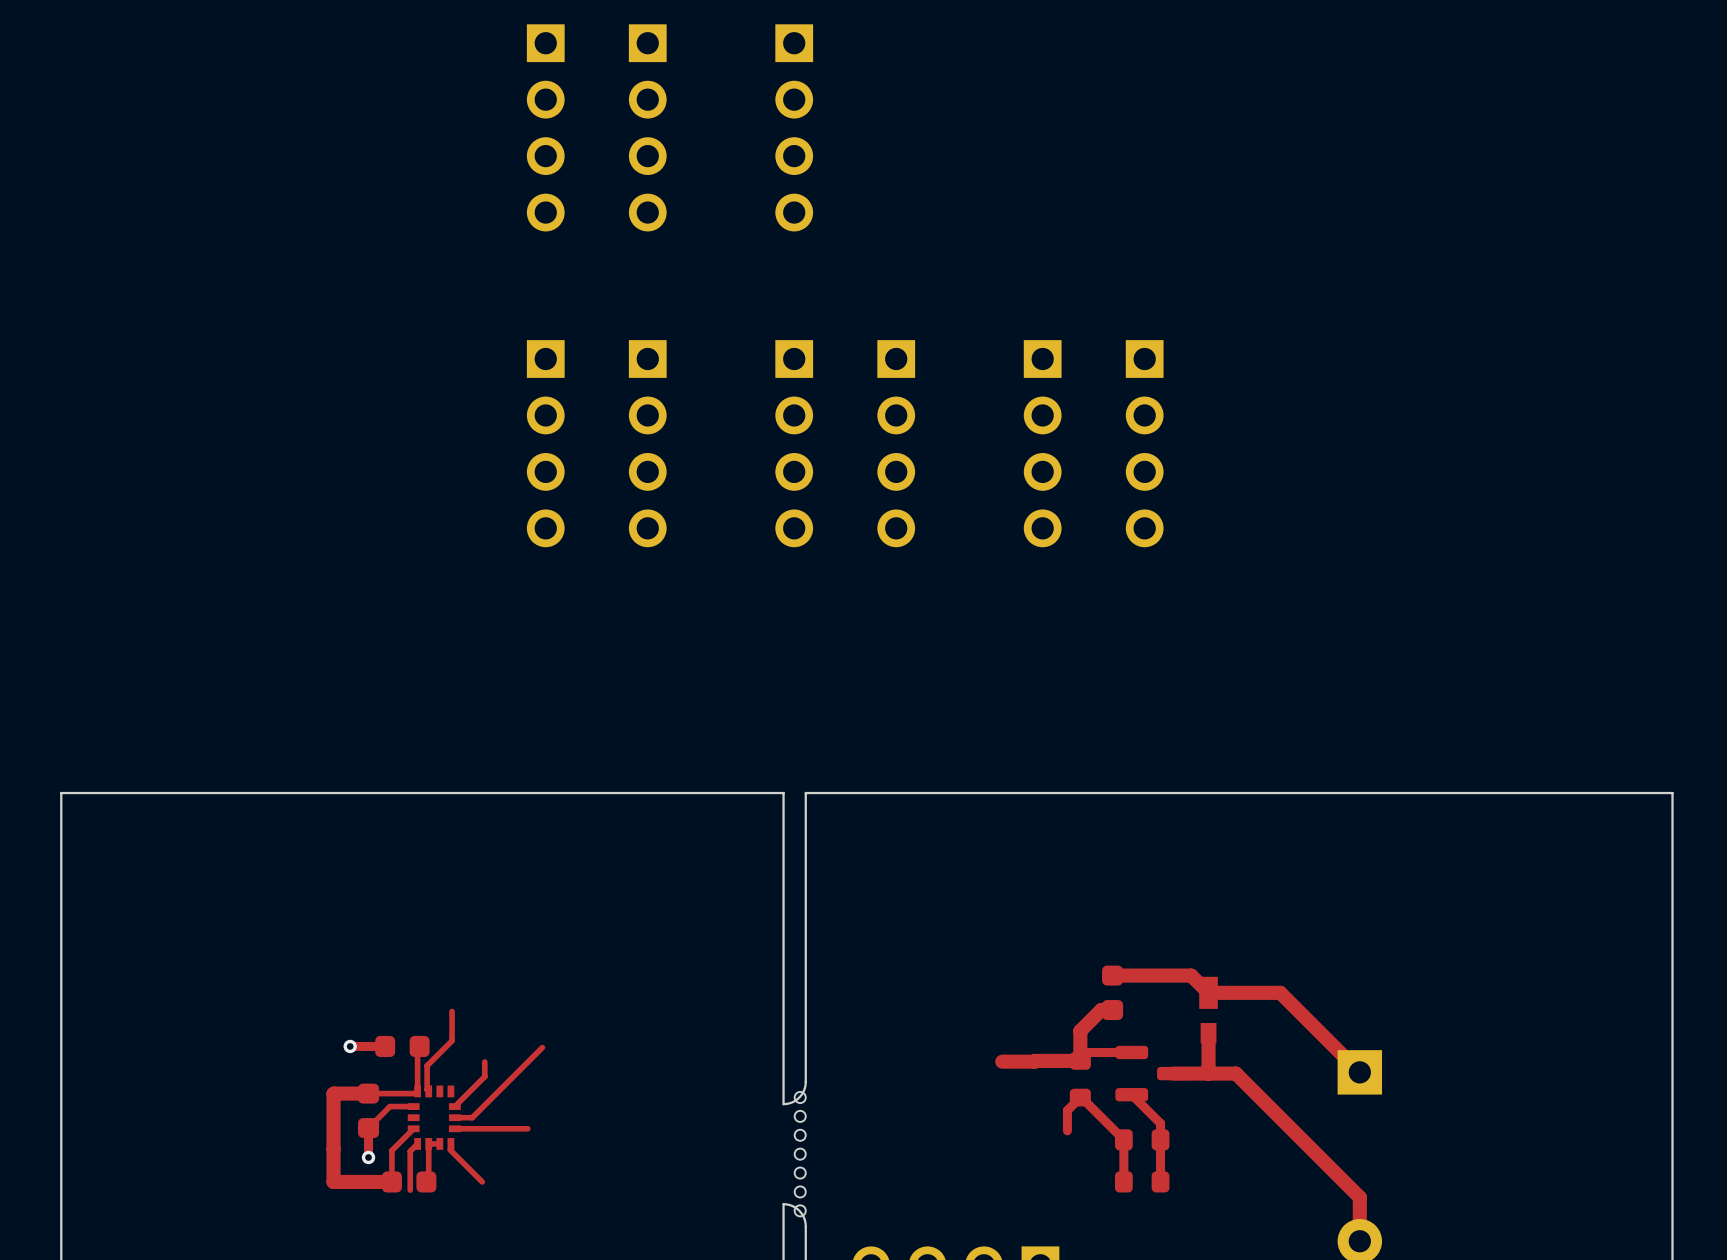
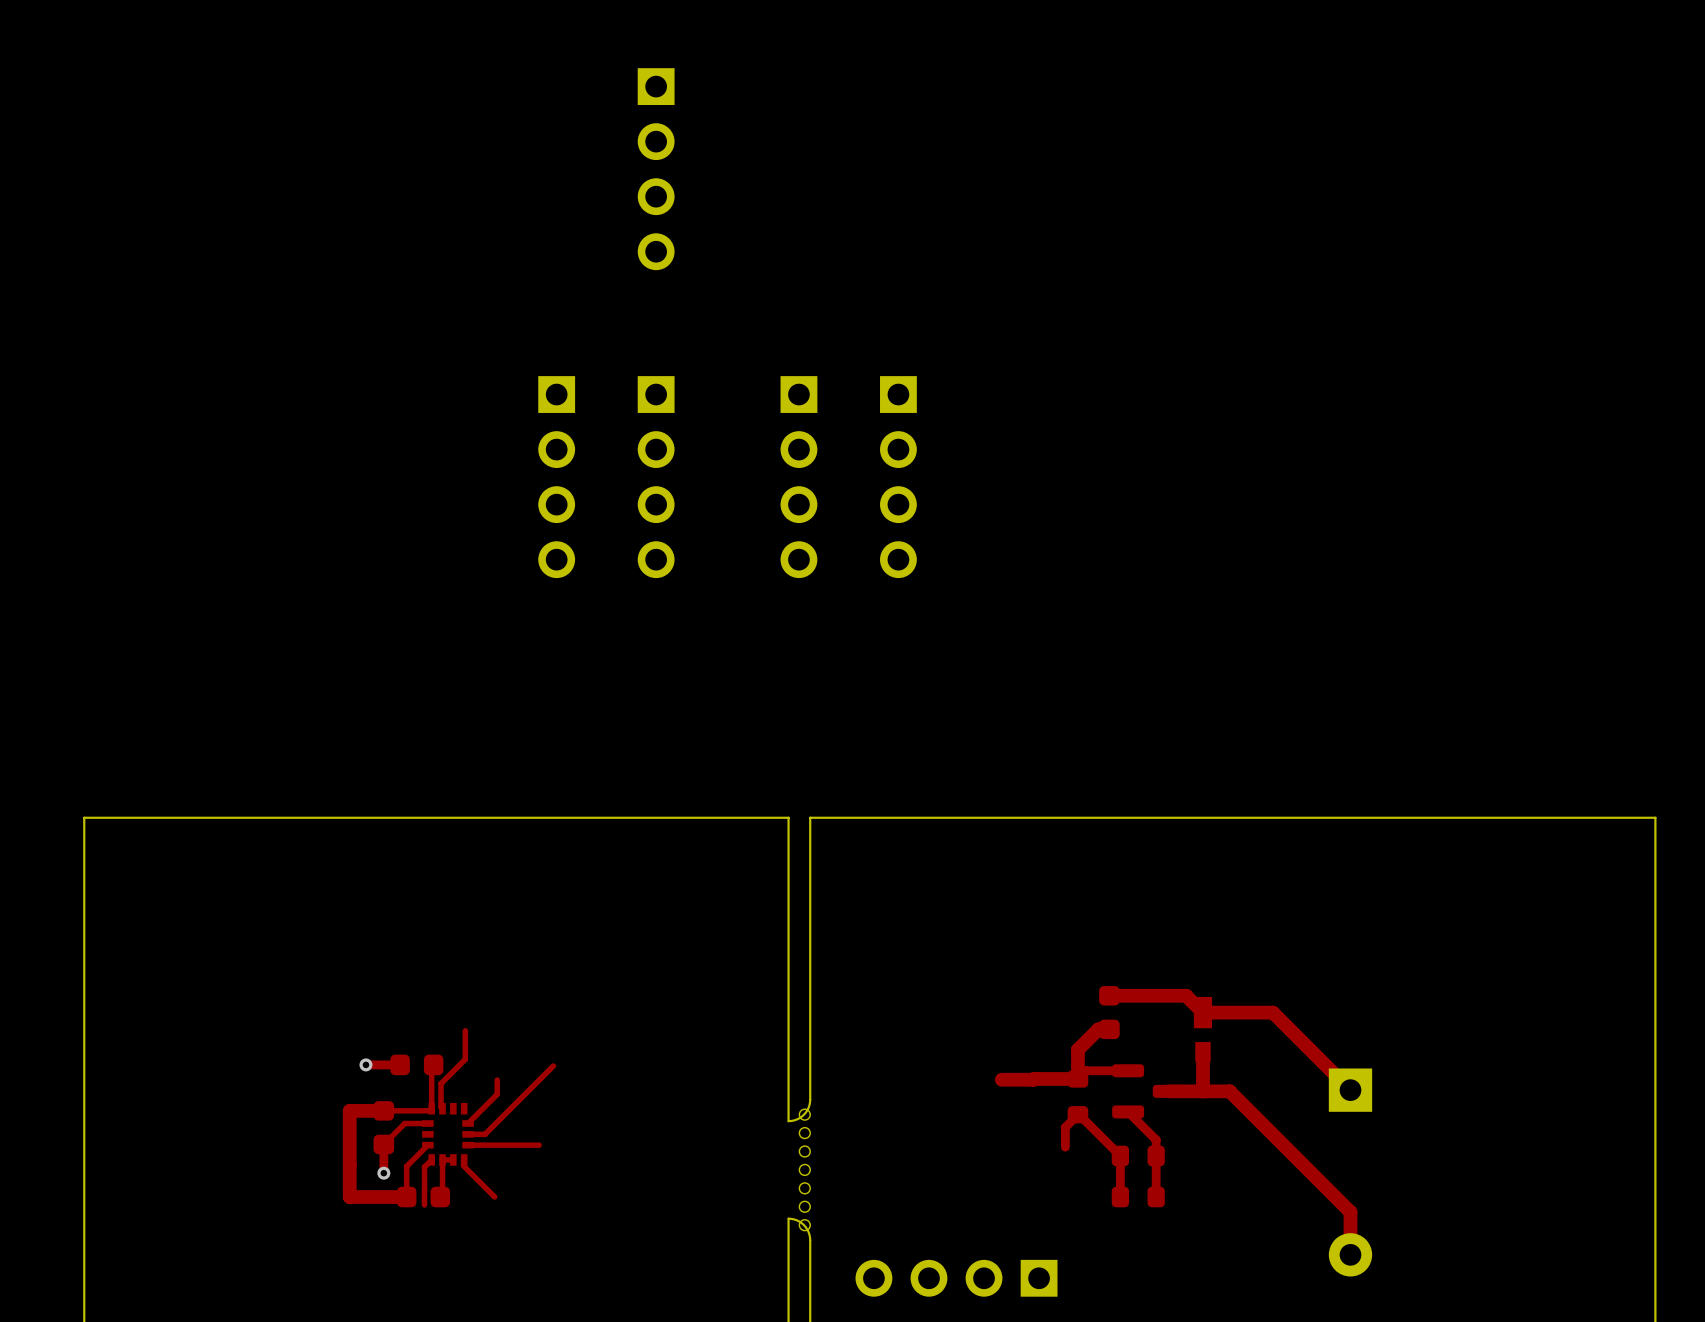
part: (545, 127) -> none
part: (794, 127) -> none
part: (1042, 443) -> none
part: (1144, 443) -> none

